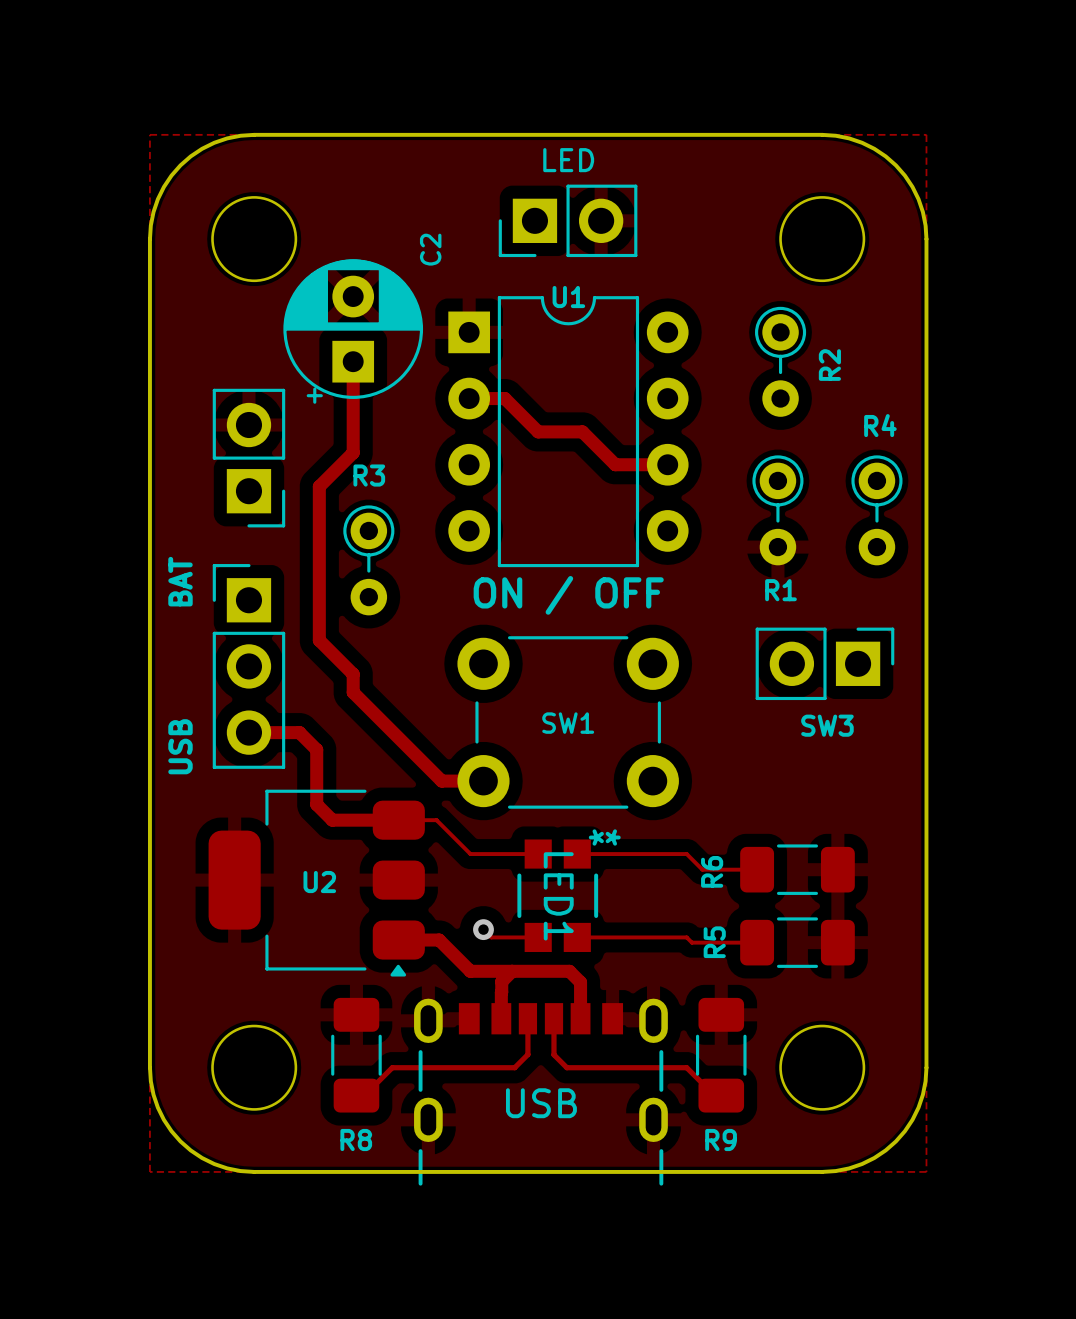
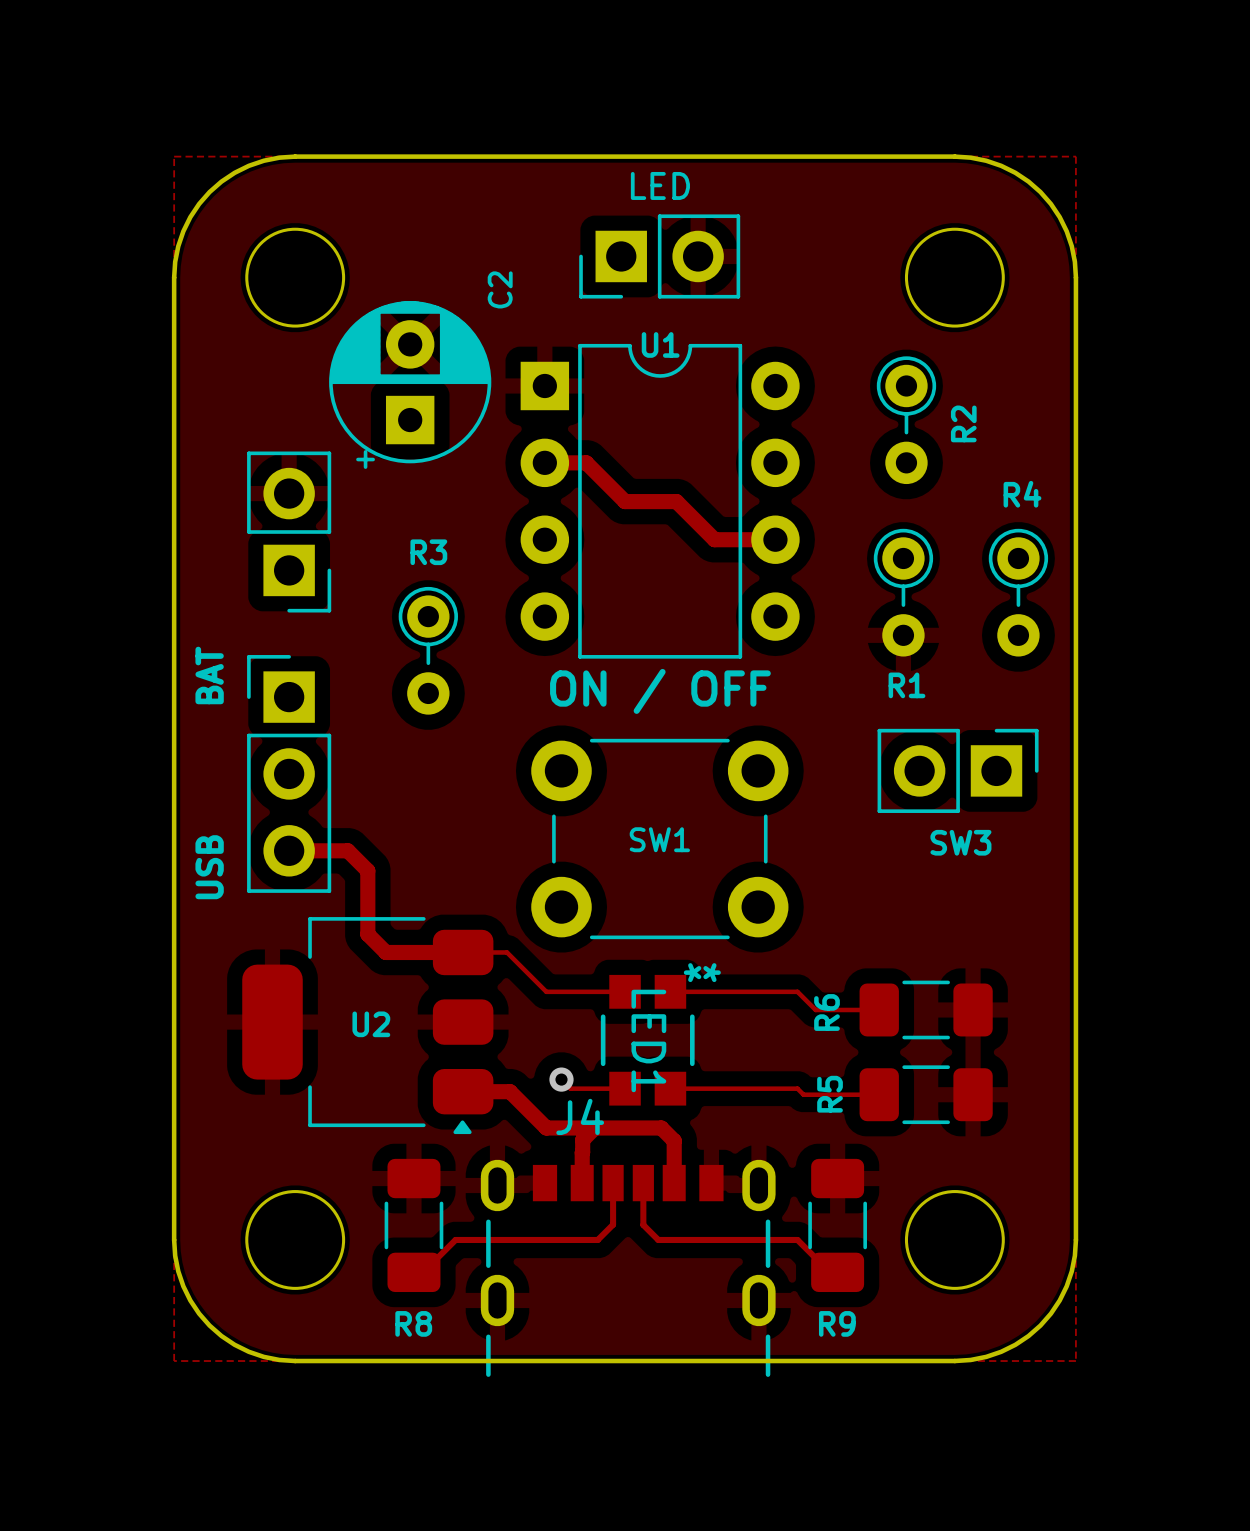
track: (353, 361) (353, 452) (319, 486) (319, 640) (353, 674) (353, 692) (441, 781) (483, 781) -> none
USB name: USB (541, 1103) -> J4 (580, 1116)

